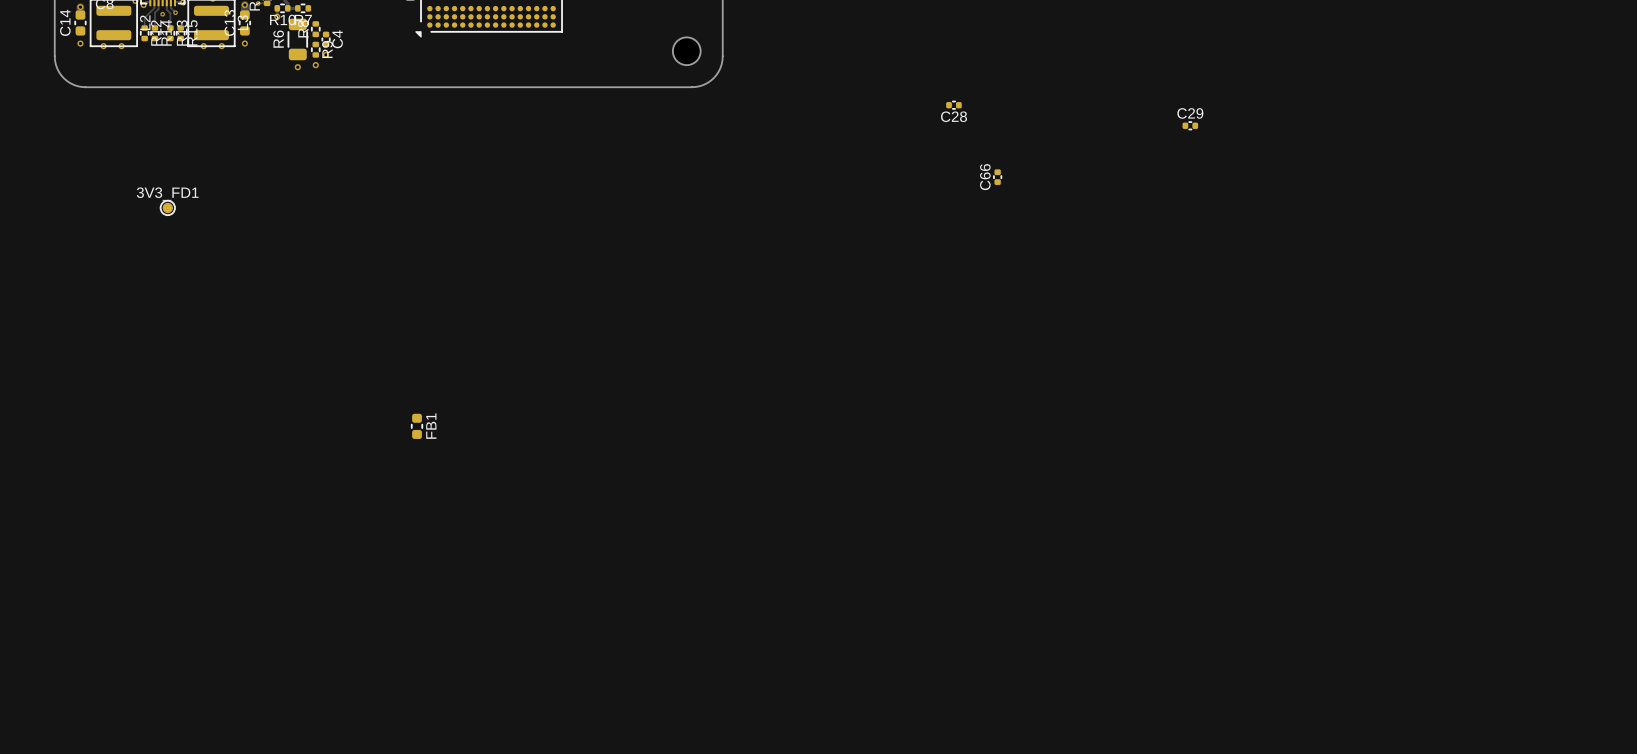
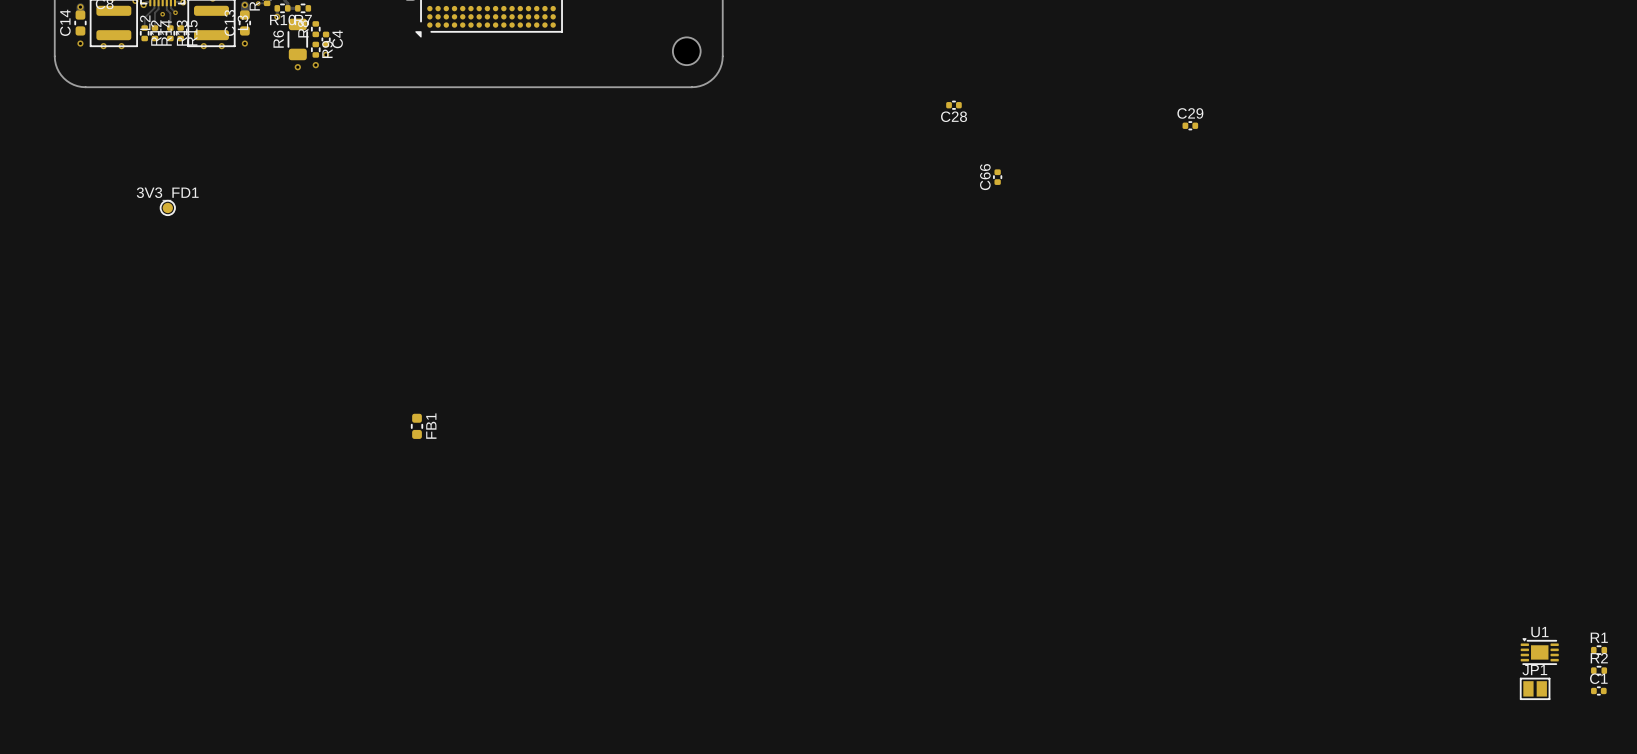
R1: none -> (1599, 650)
U1: none -> (1539, 651)
R2: none -> (1599, 670)
JP1: none -> (1535, 688)
C1: none -> (1598, 690)

